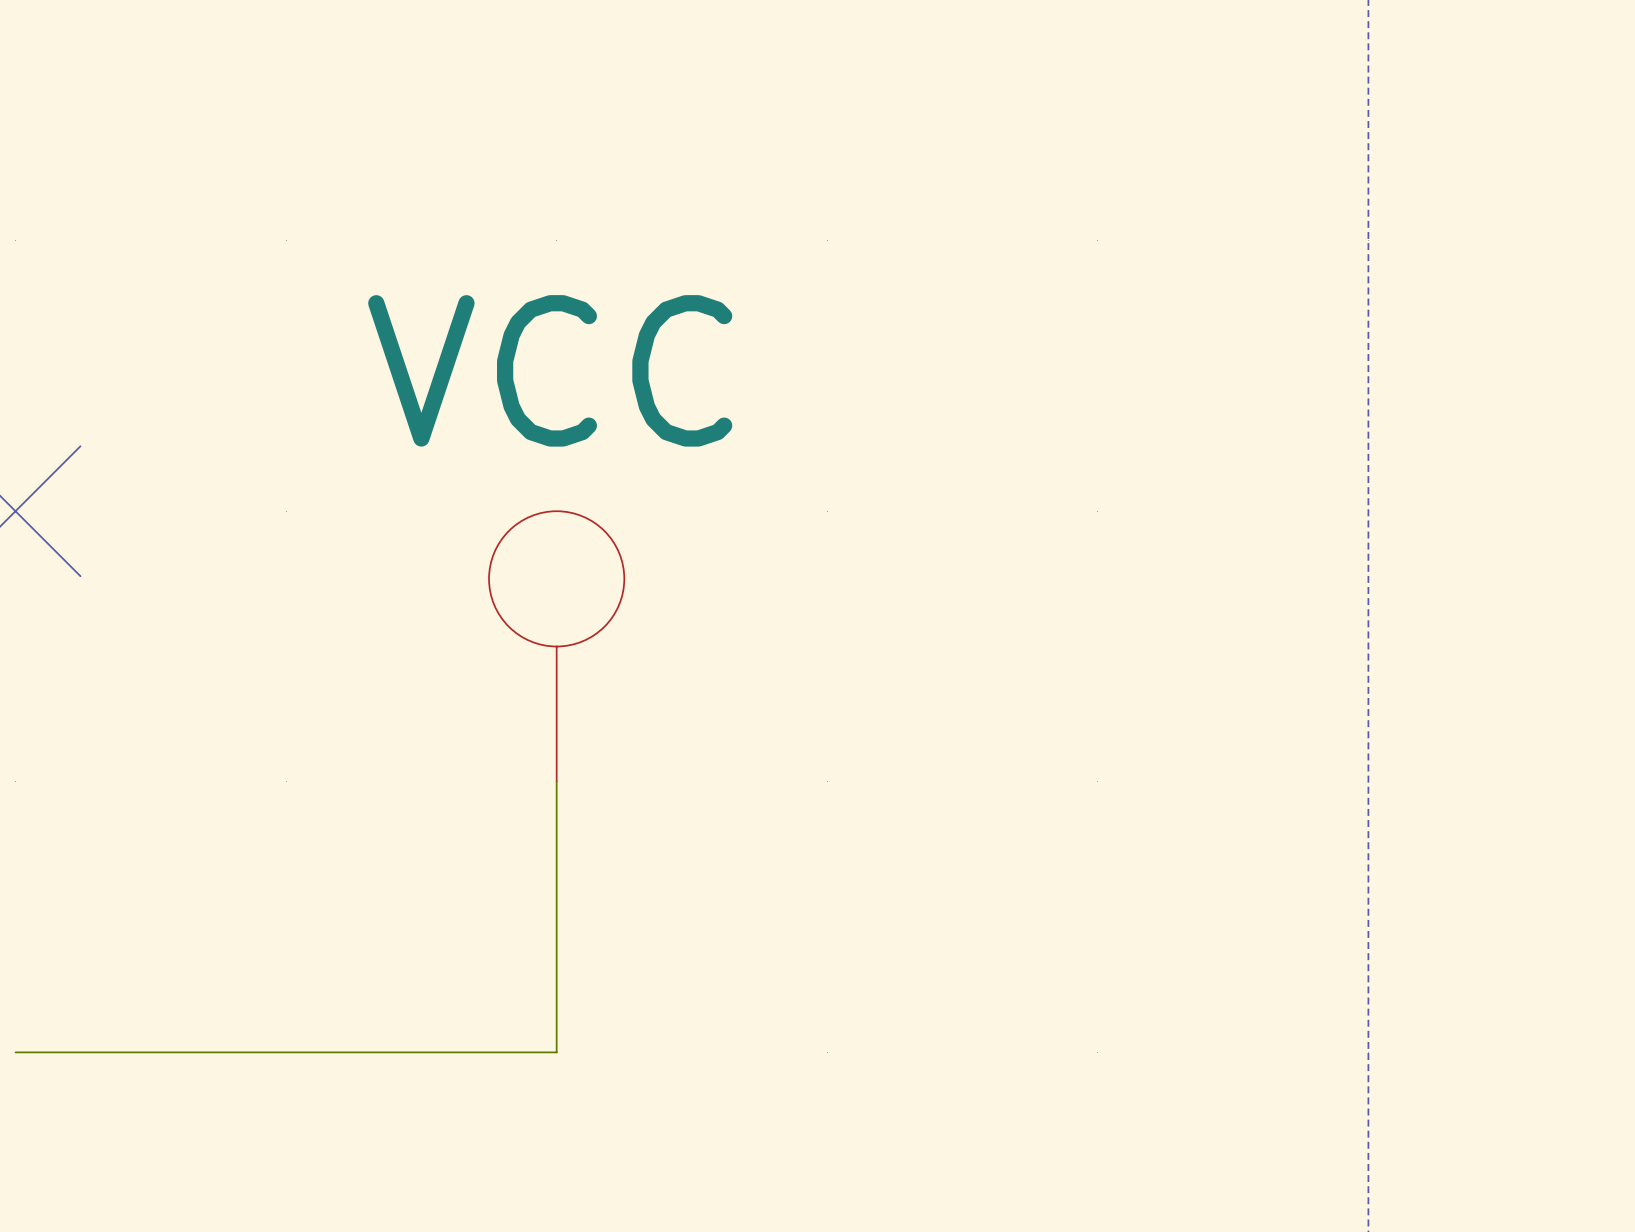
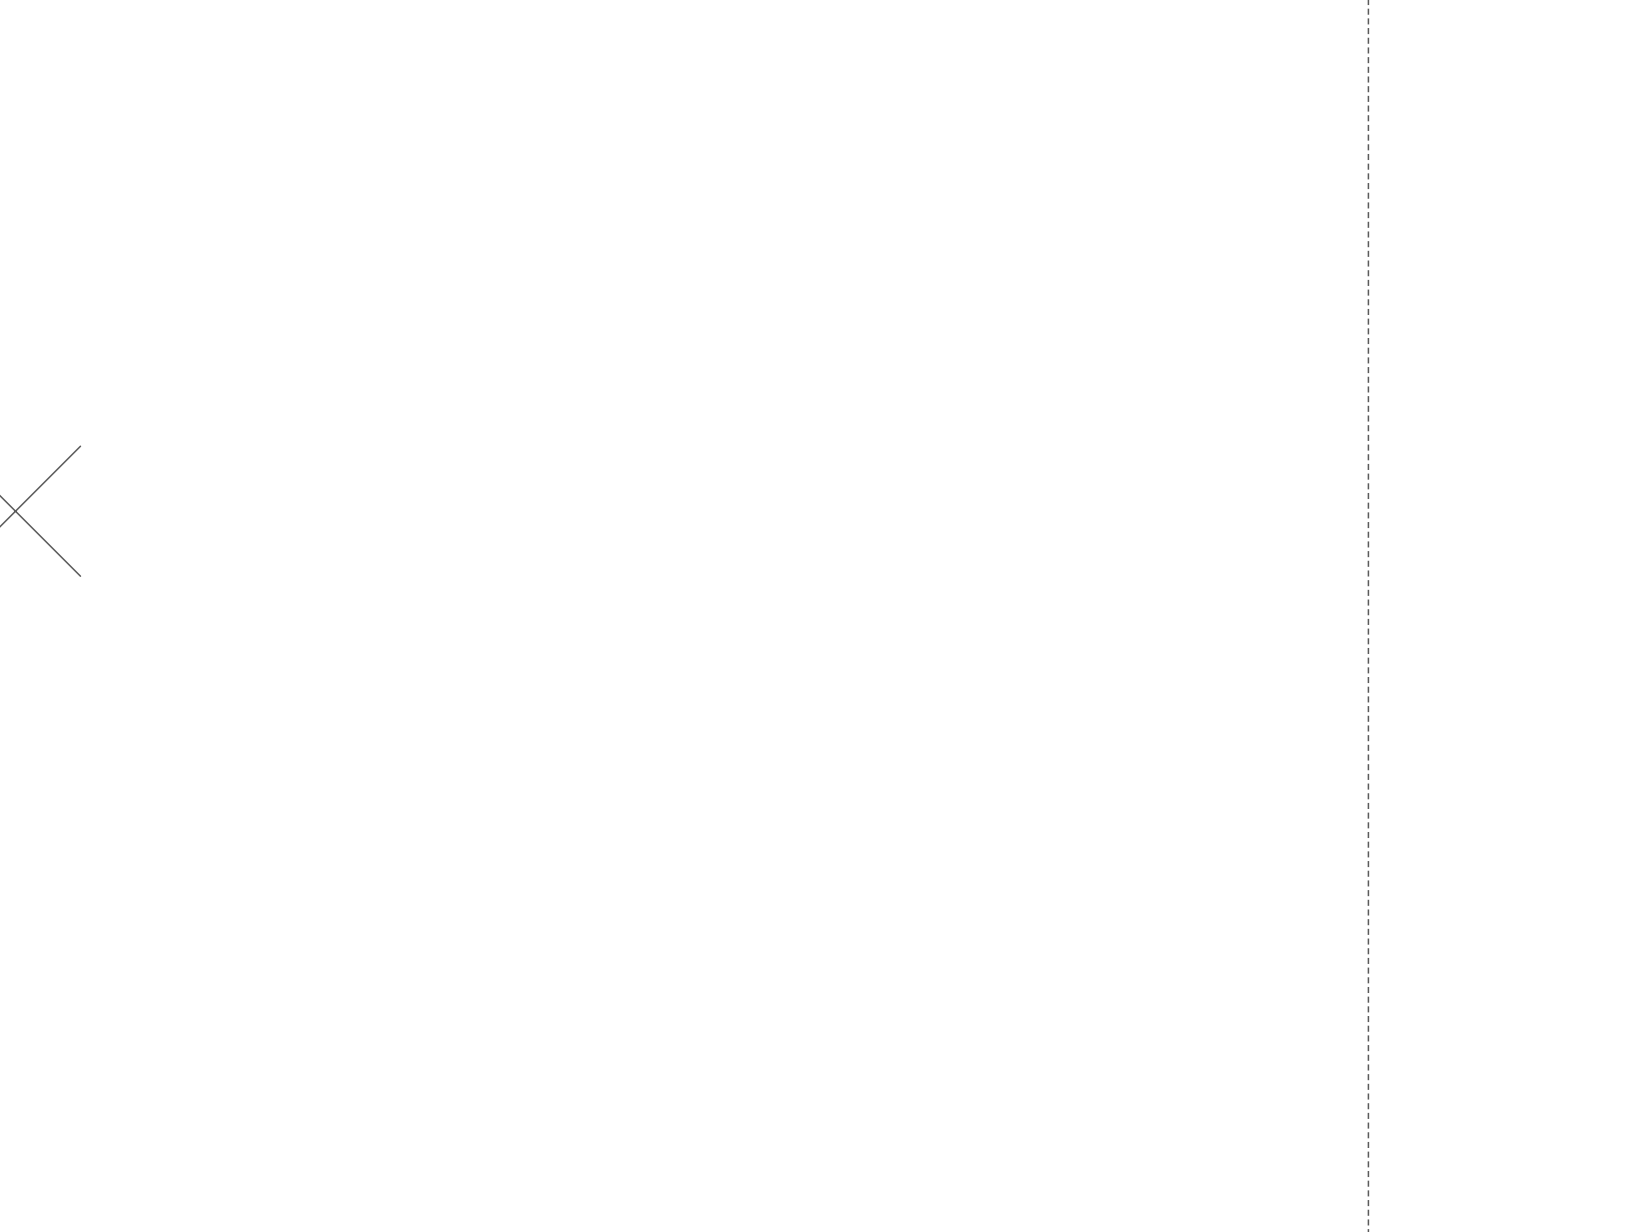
power symbol: VCC (556, 646) -> none
wire: (556, 781) (556, 1052) (15, 1052) -> none

